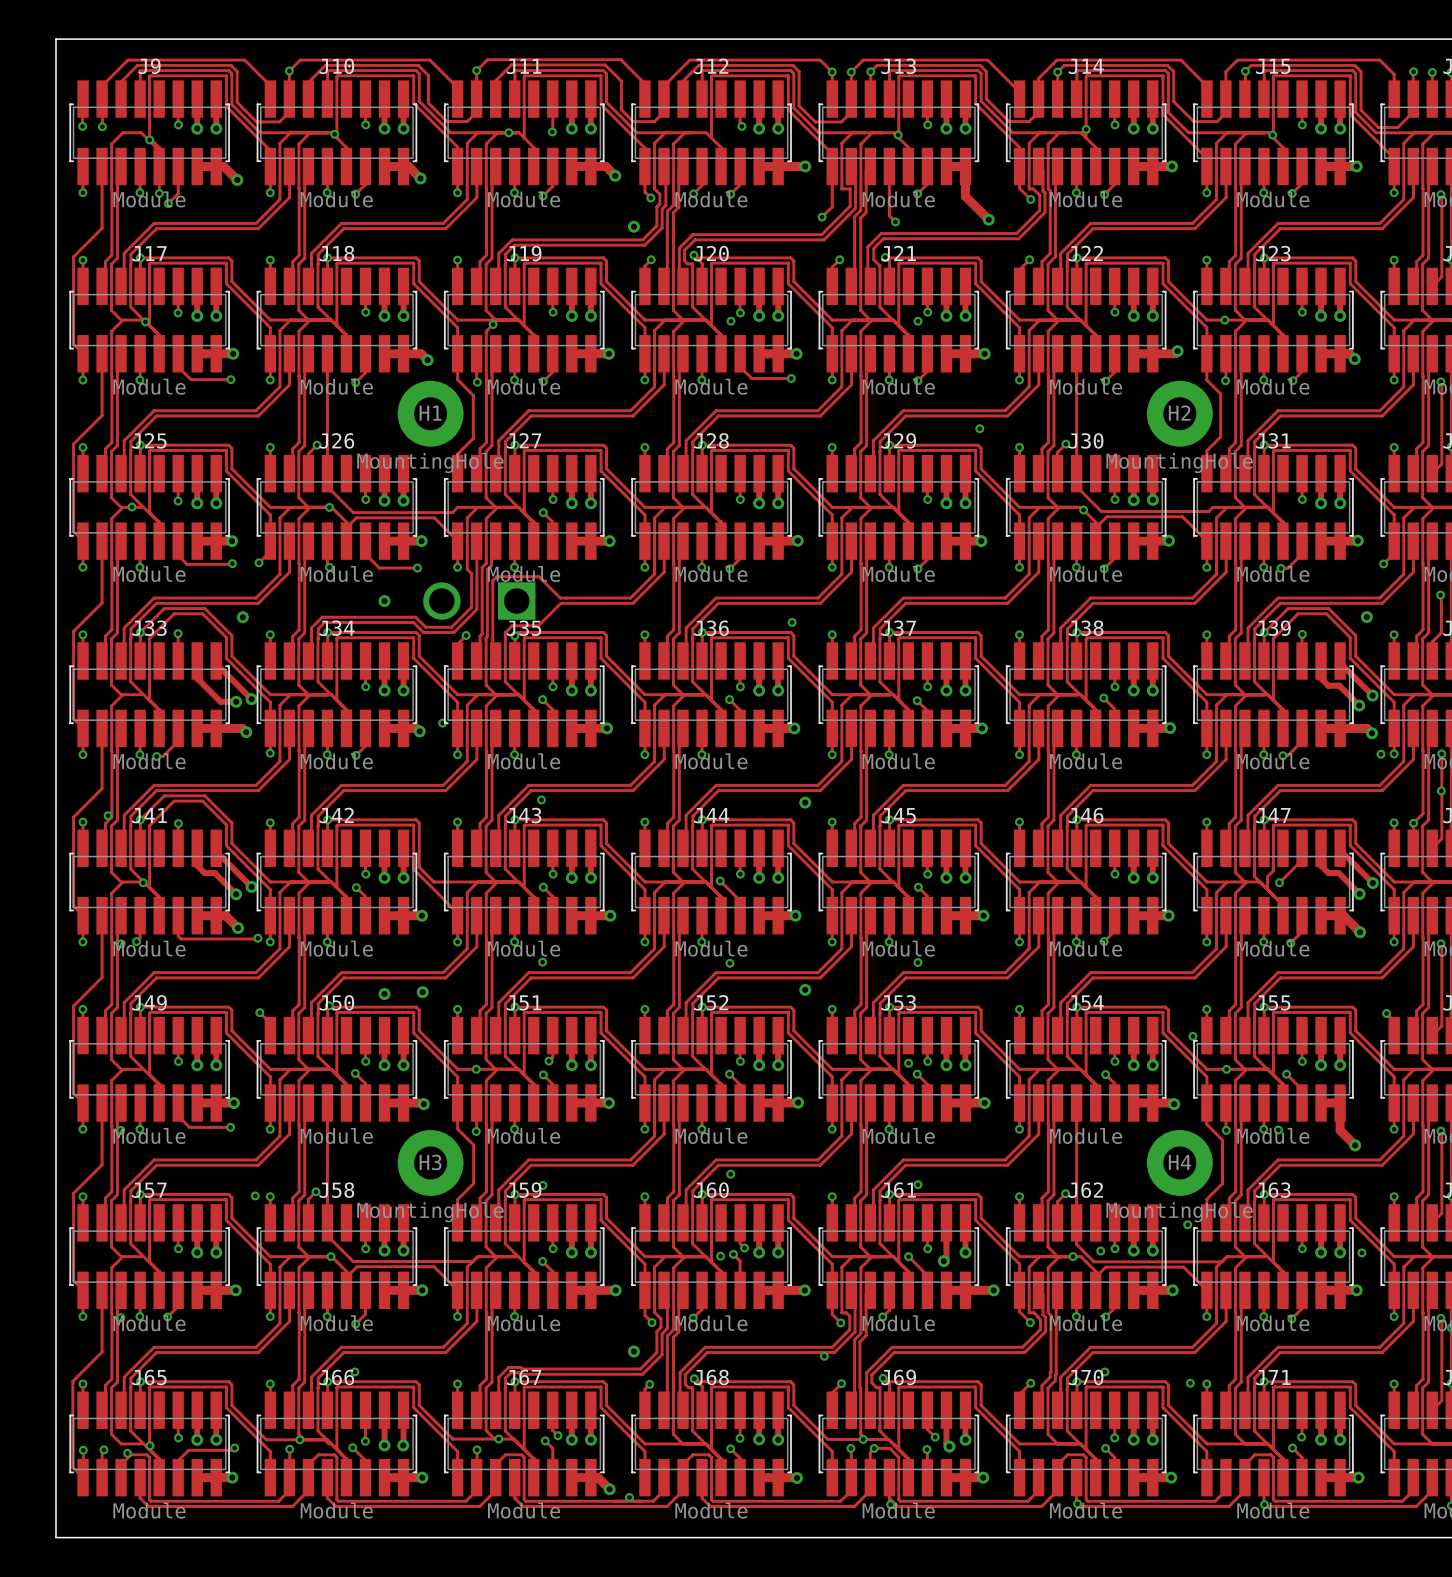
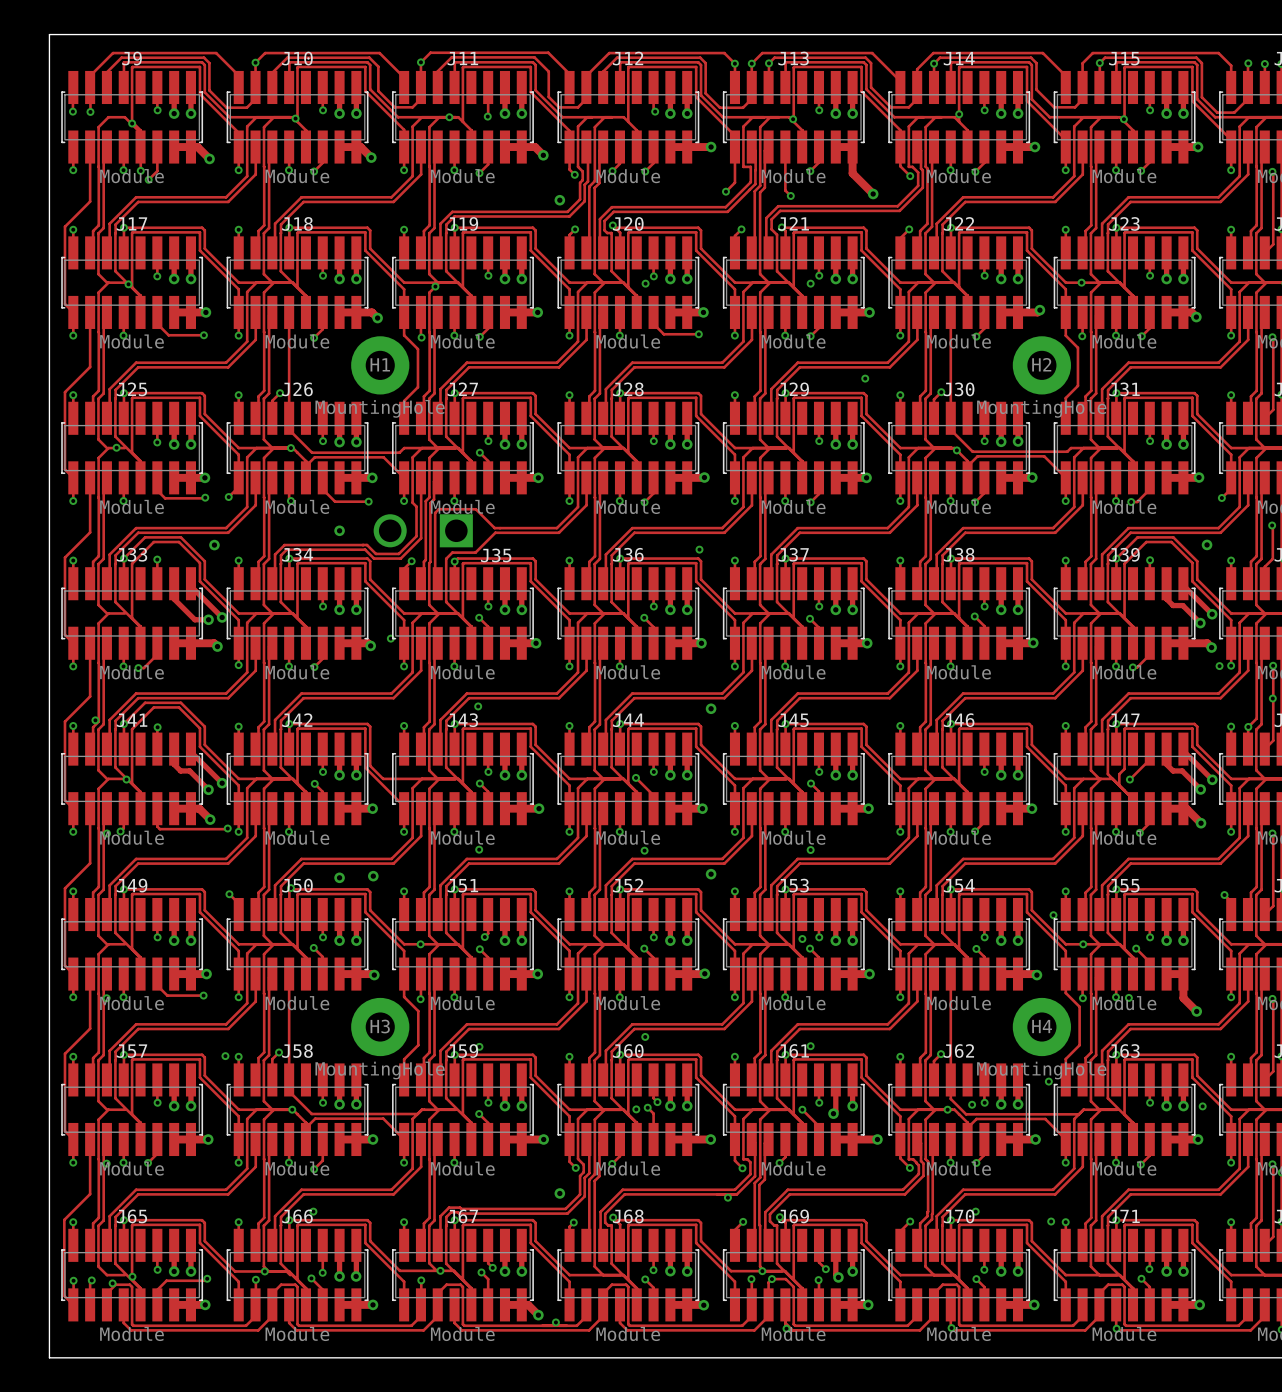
J35 name position: J35 (523, 628) -> J35 (496, 555)

